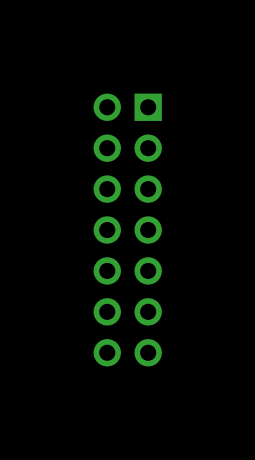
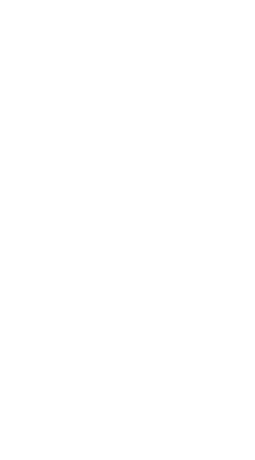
part: (127, 230) -> none

